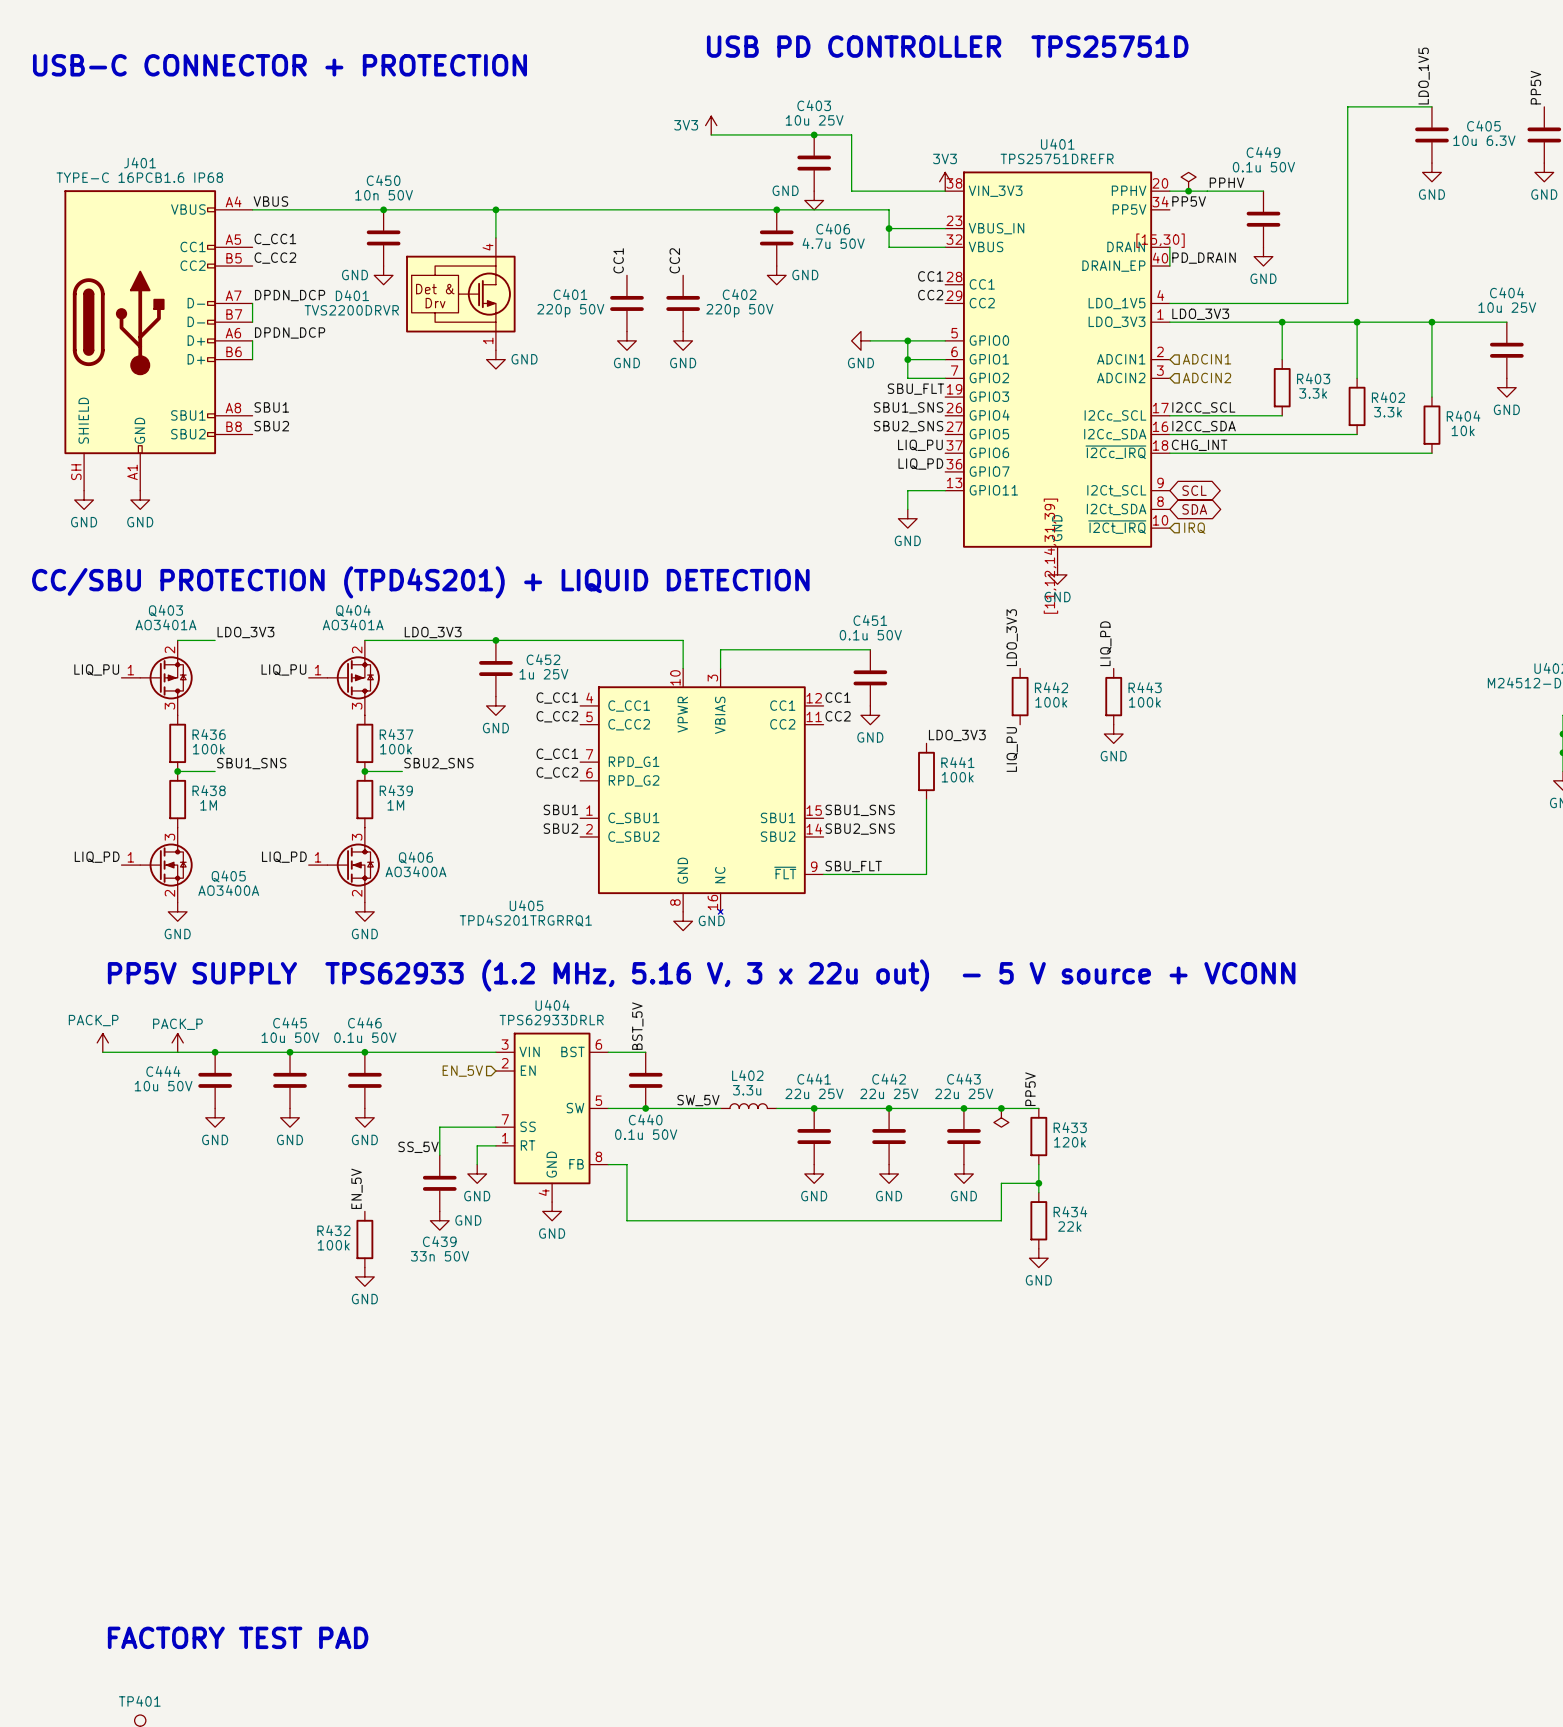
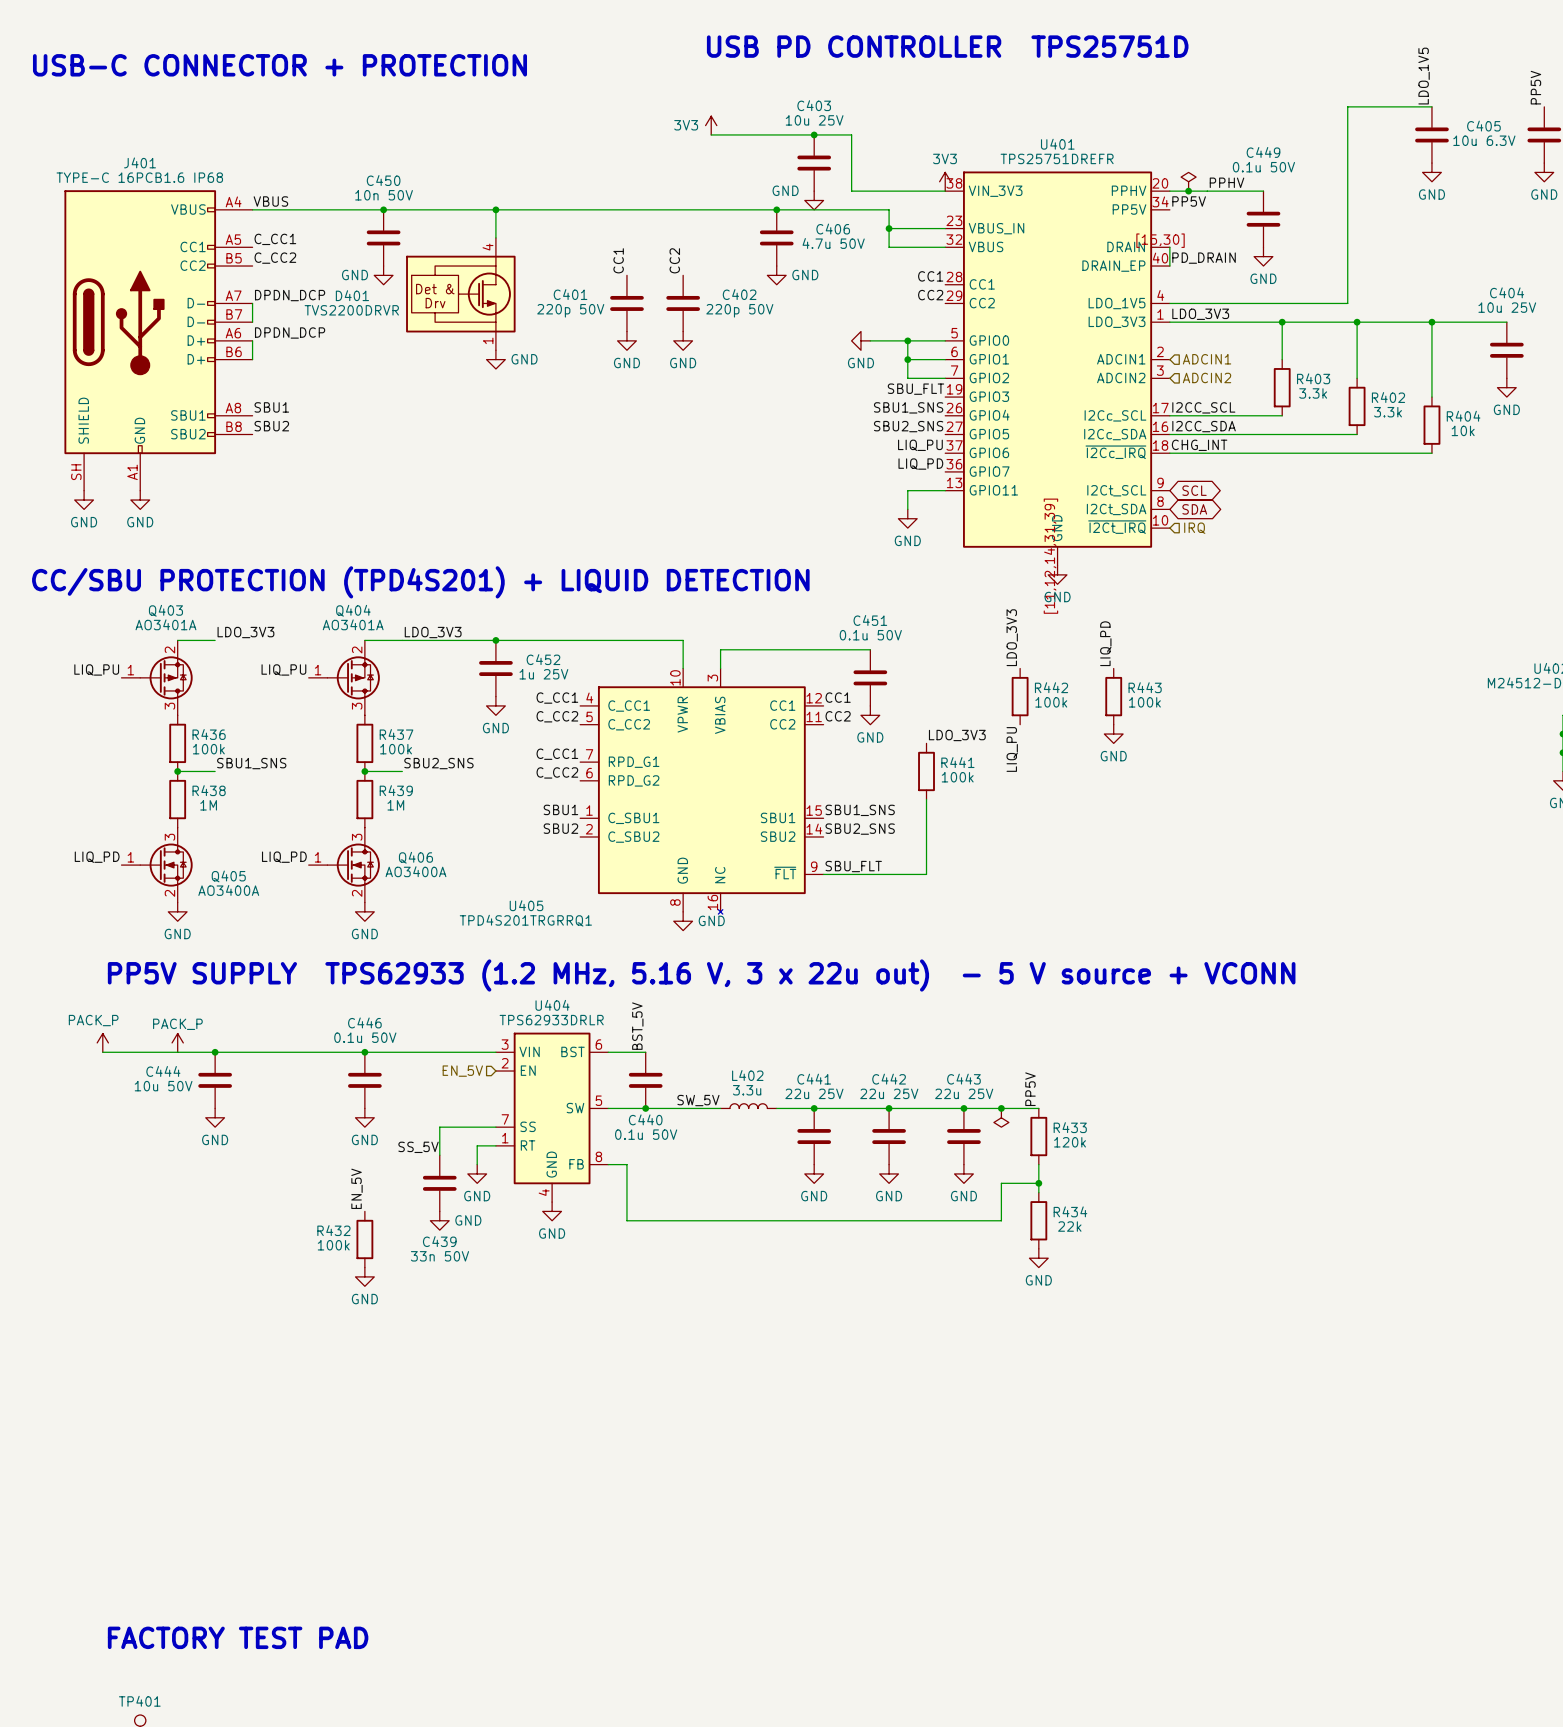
junction: (290, 1052) -> none
C445: 10u 50V (290, 1080) -> none
power symbol: GND (290, 1117) -> none

